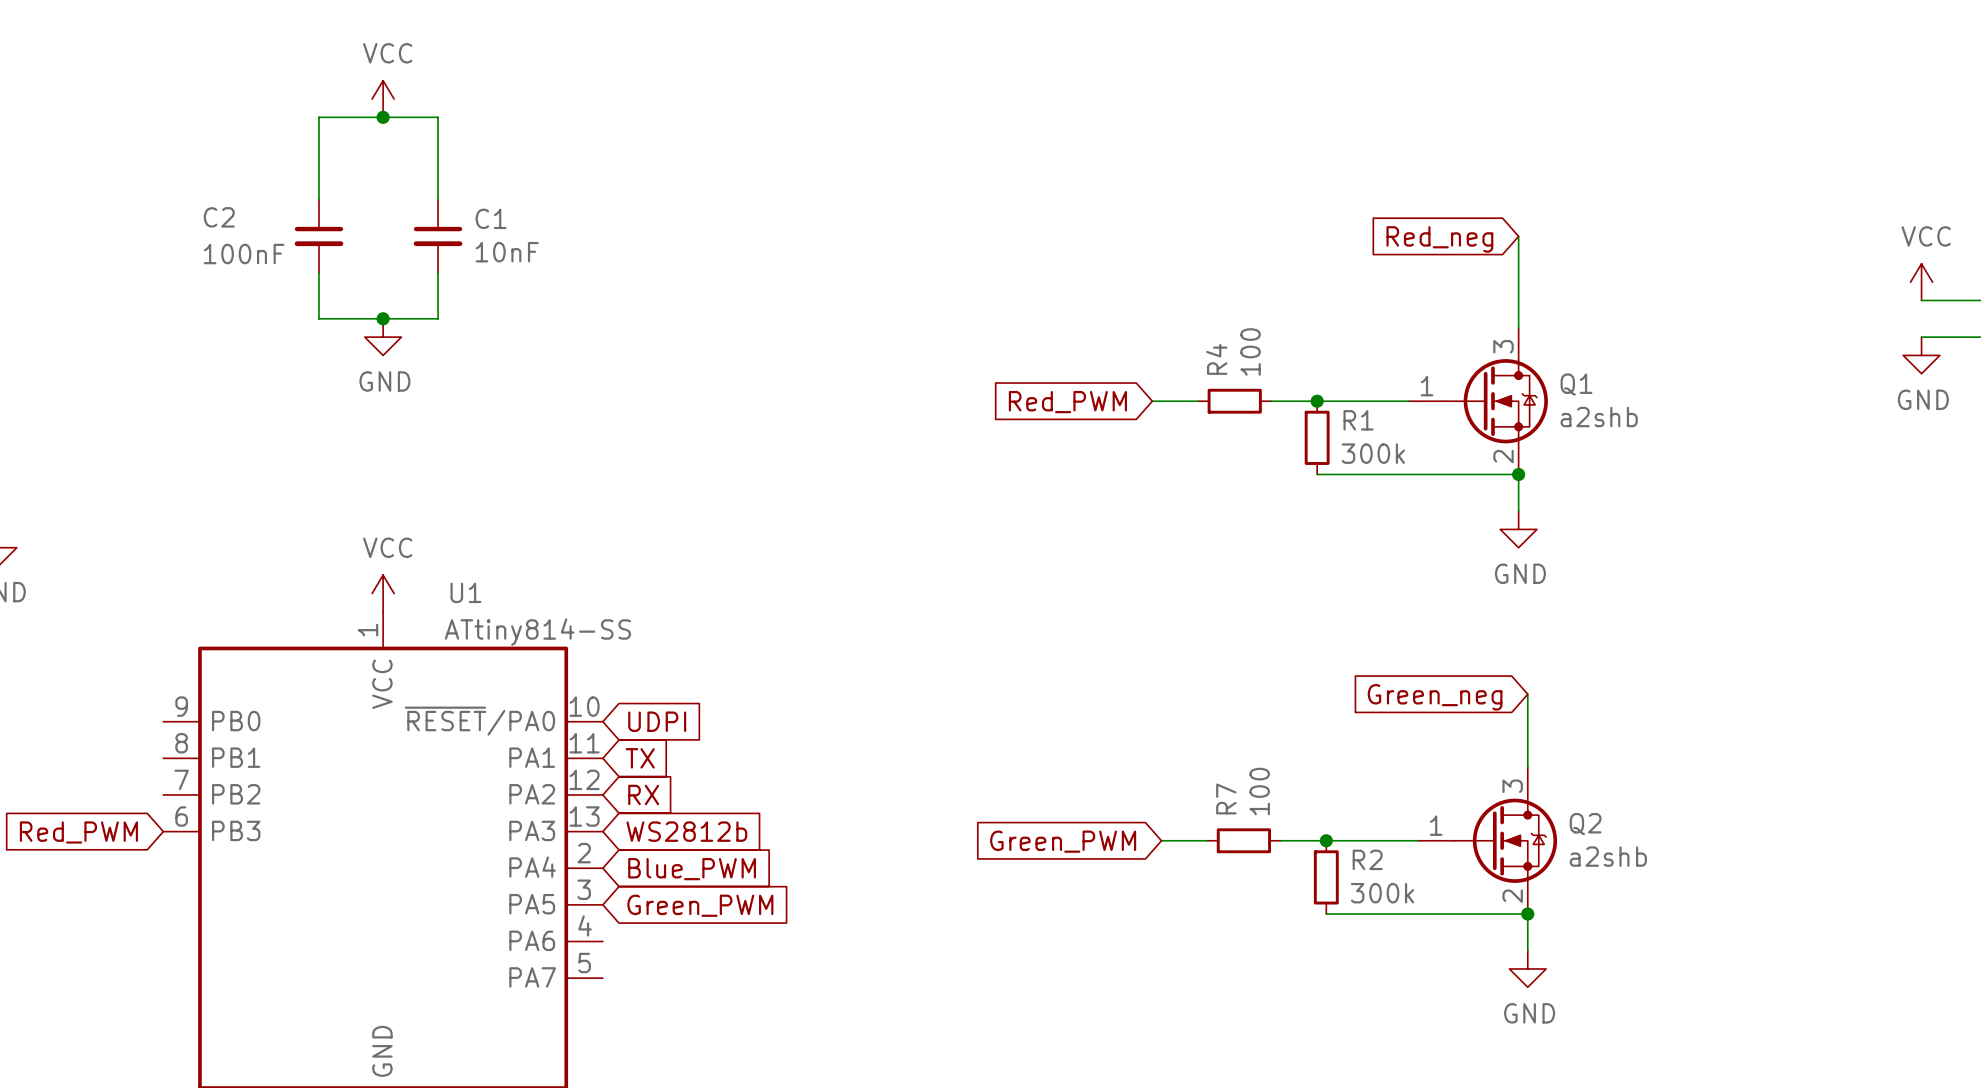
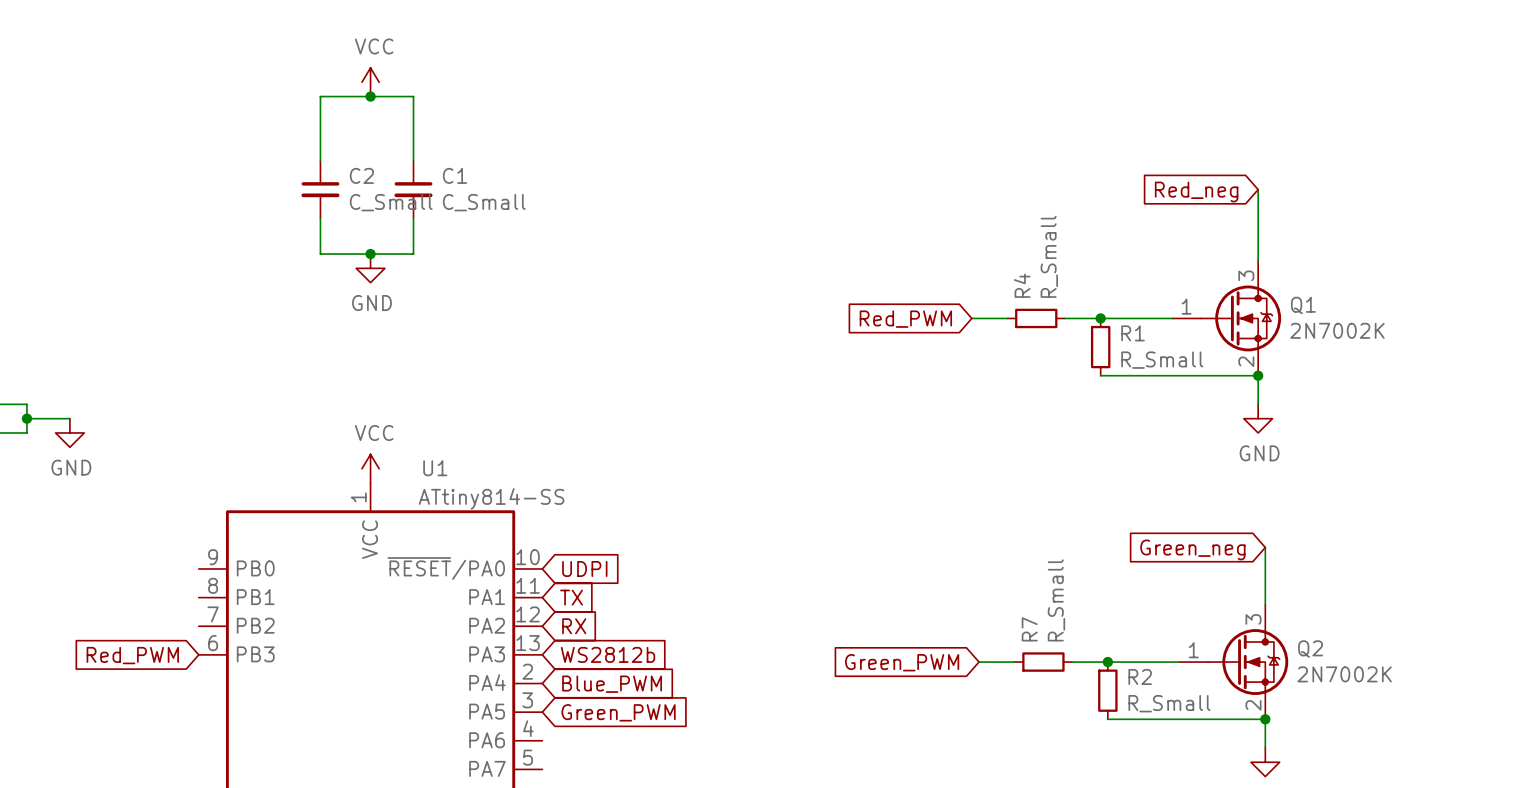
C2 name position: C2 (219, 217) -> C2 (361, 175)
C1 value: 10nF (507, 252) -> C_Small (484, 202)
C2 value: 100nF (244, 254) -> C_Small (391, 202)
R4 value: 100 (1250, 351) -> R_Small (1049, 256)
Q1 value: a2shb (1599, 417) -> 2N7002K (1337, 330)
R1 value: 300k (1373, 453) -> R_Small (1162, 360)
R7 value: 100 (1259, 791) -> R_Small (1056, 600)
Q2 value: a2shb (1608, 856) -> 2N7002K (1344, 674)
R2 value: 300k (1382, 893) -> R_Small (1169, 703)

